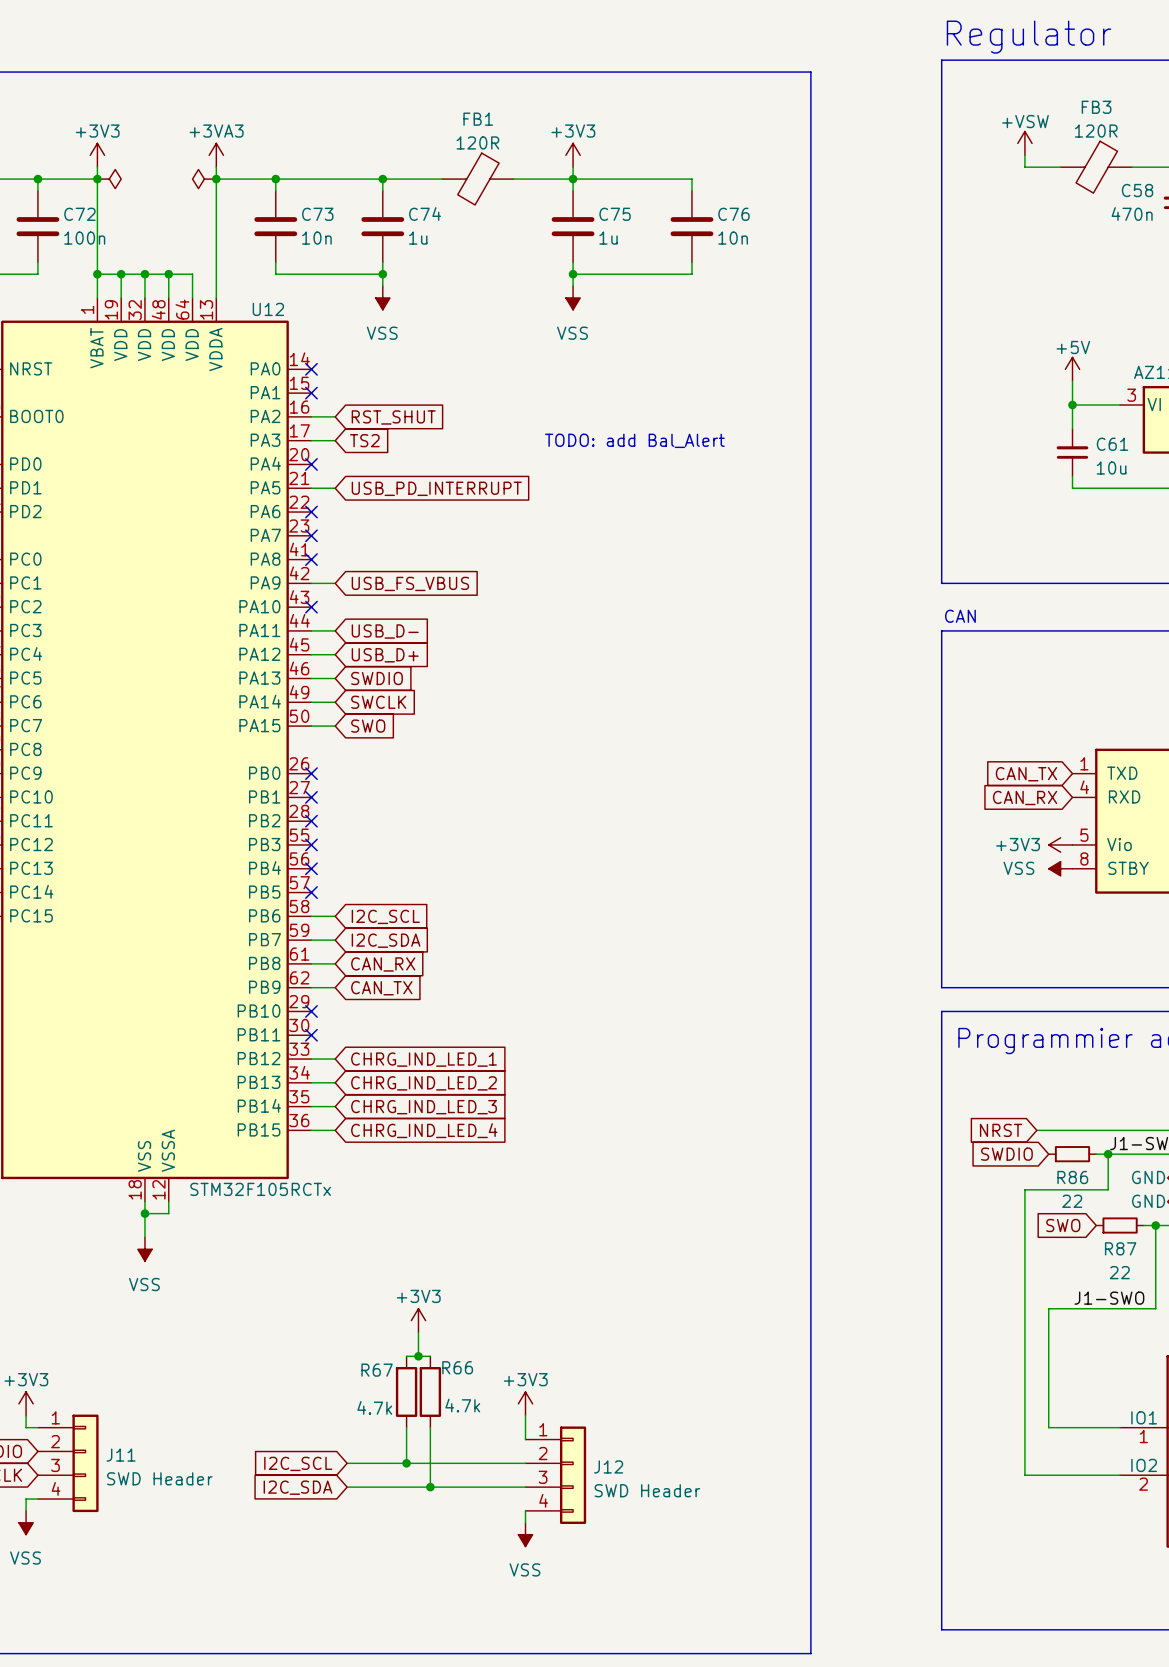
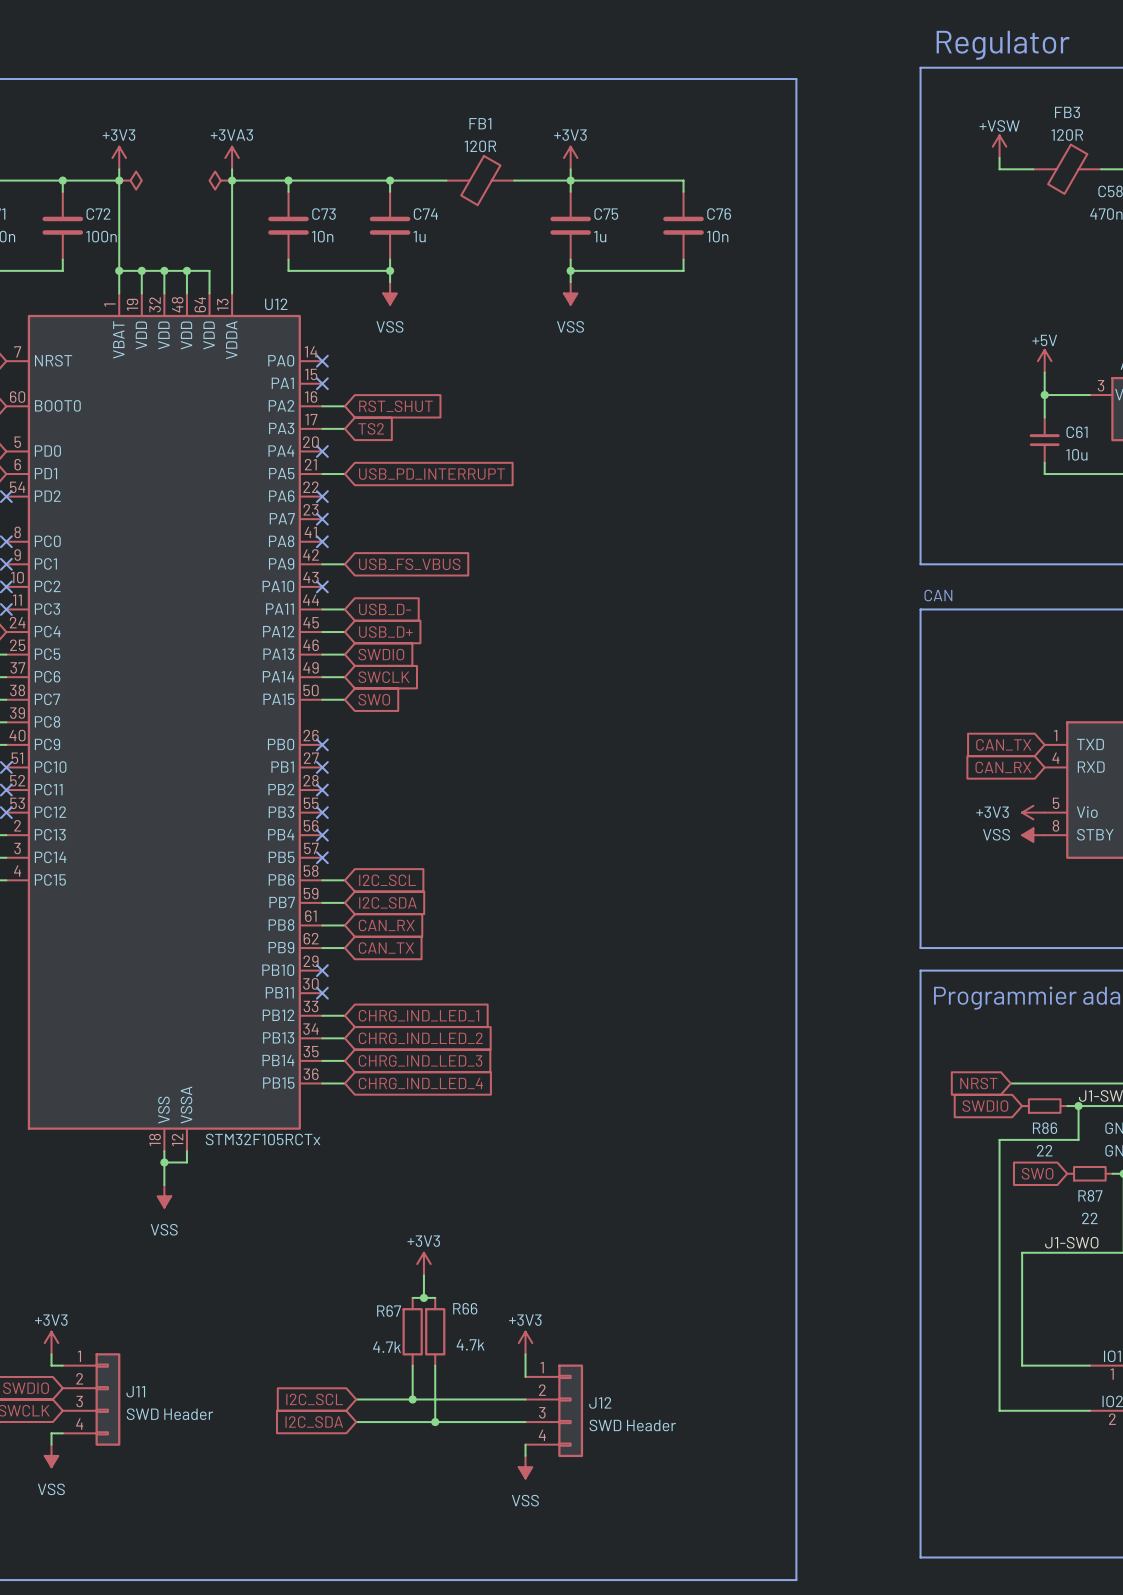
text: TODO: add Bal_Alert (634, 440) -> none

